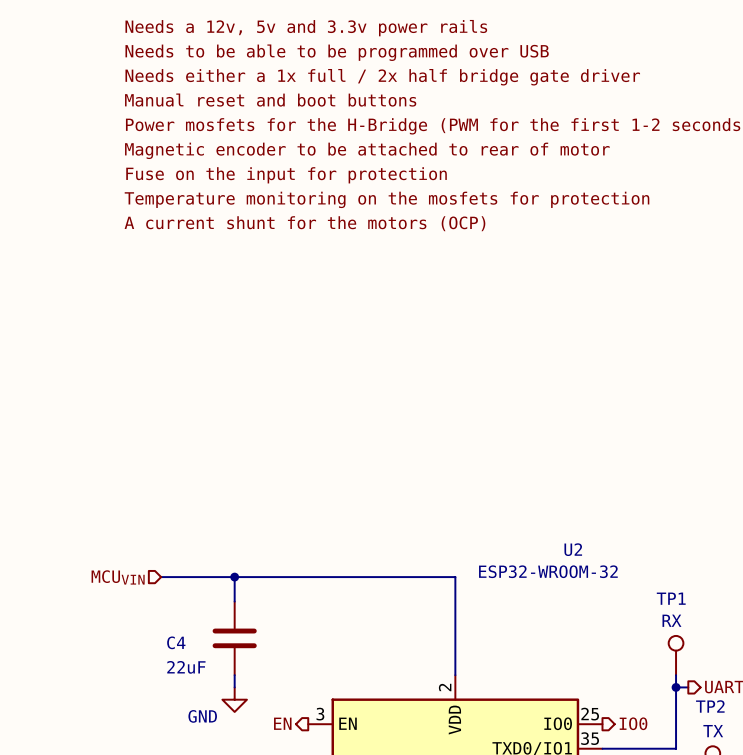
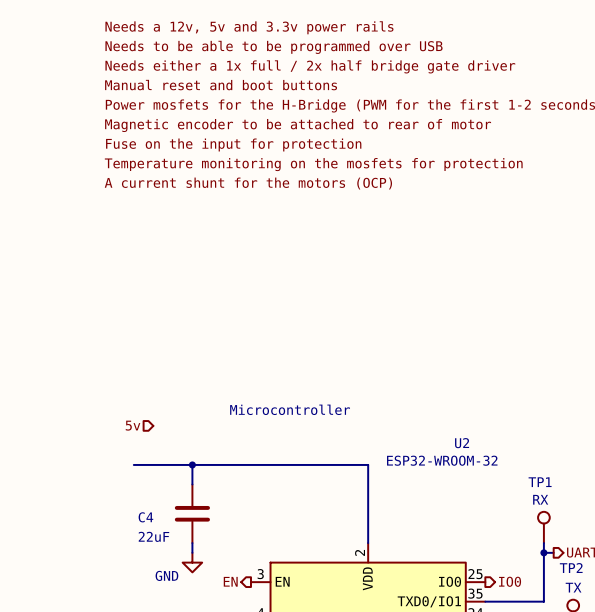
text: none -> Microcontroller (290, 409)
hierarchical label: none -> 5v (133, 425)
hierarchical label: MCUVIN (118, 577) -> none

